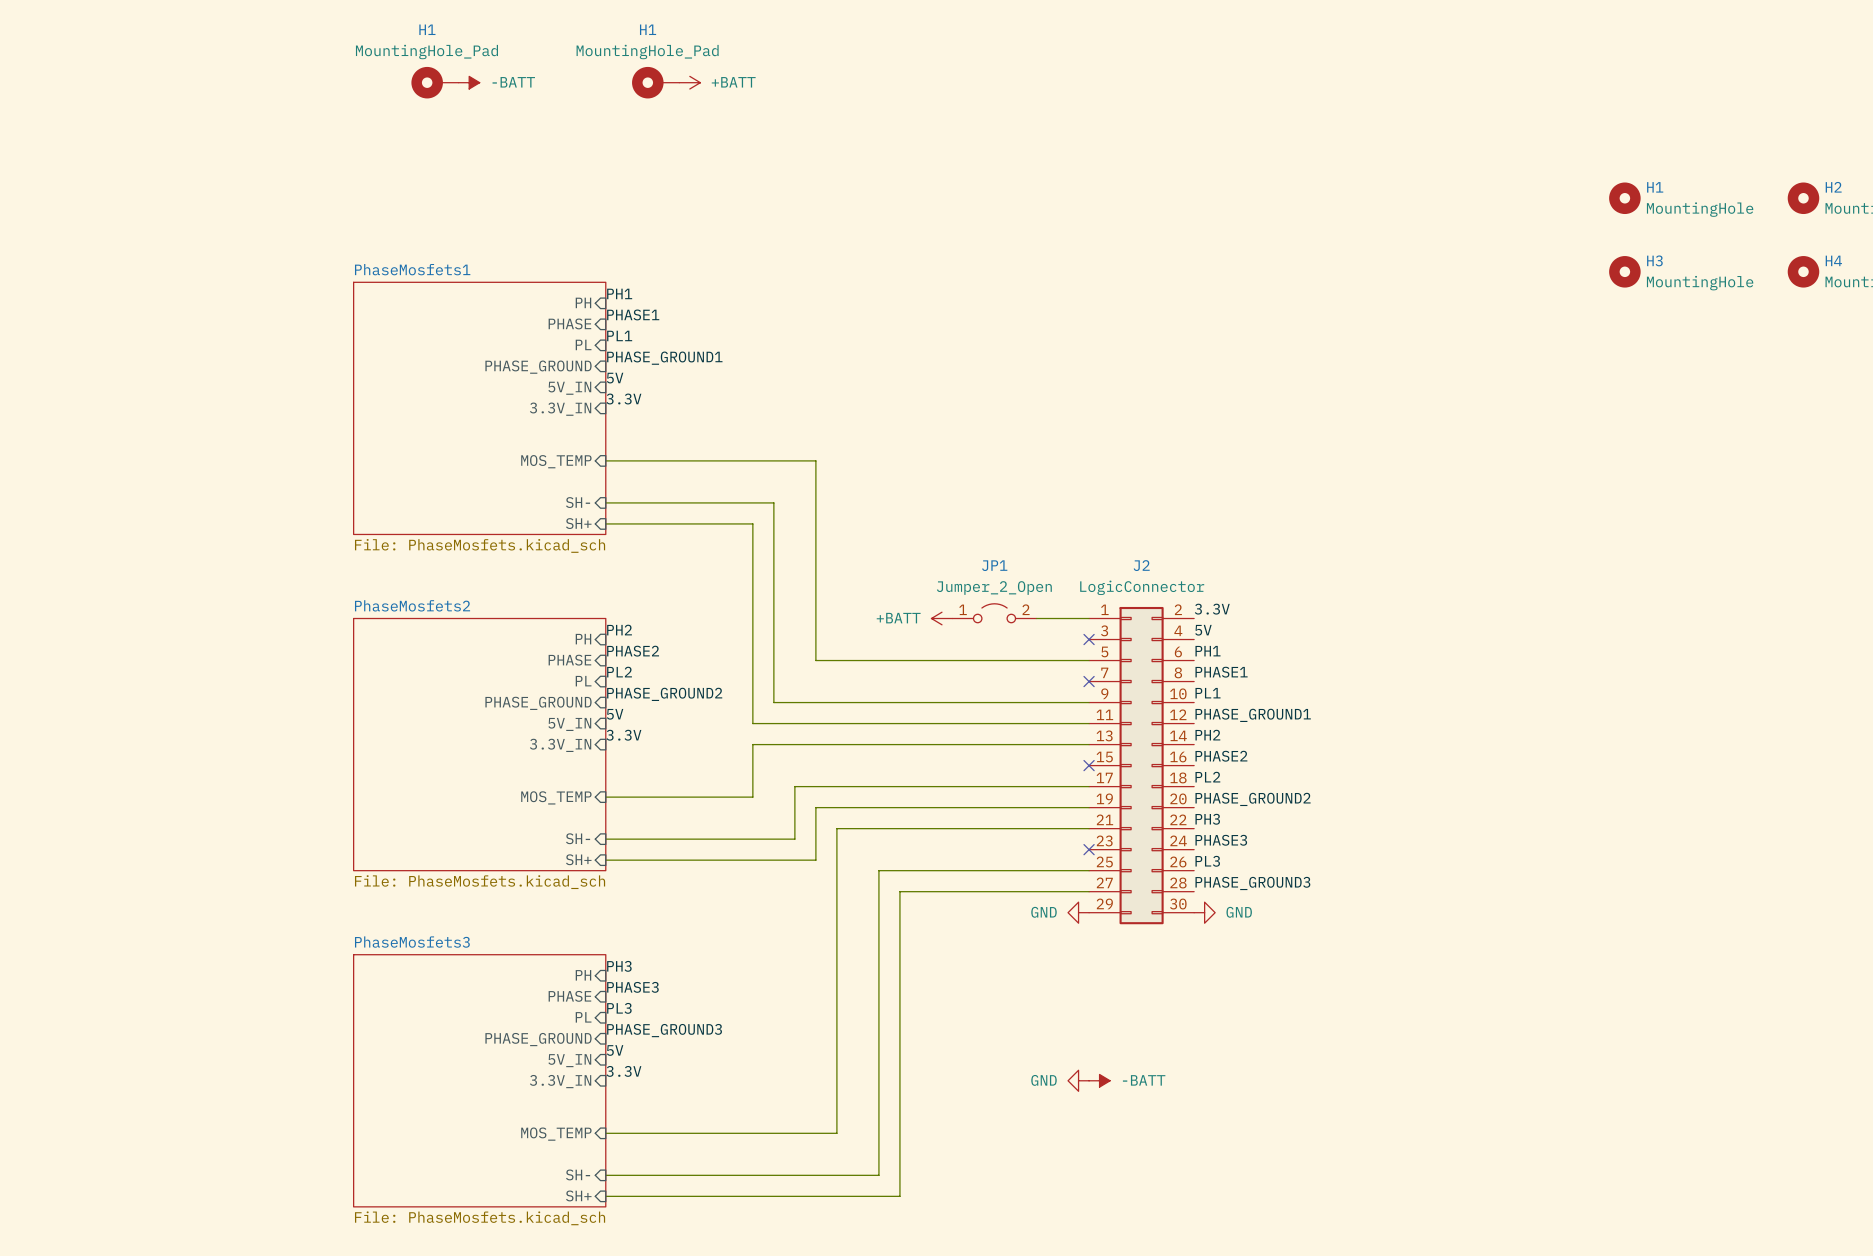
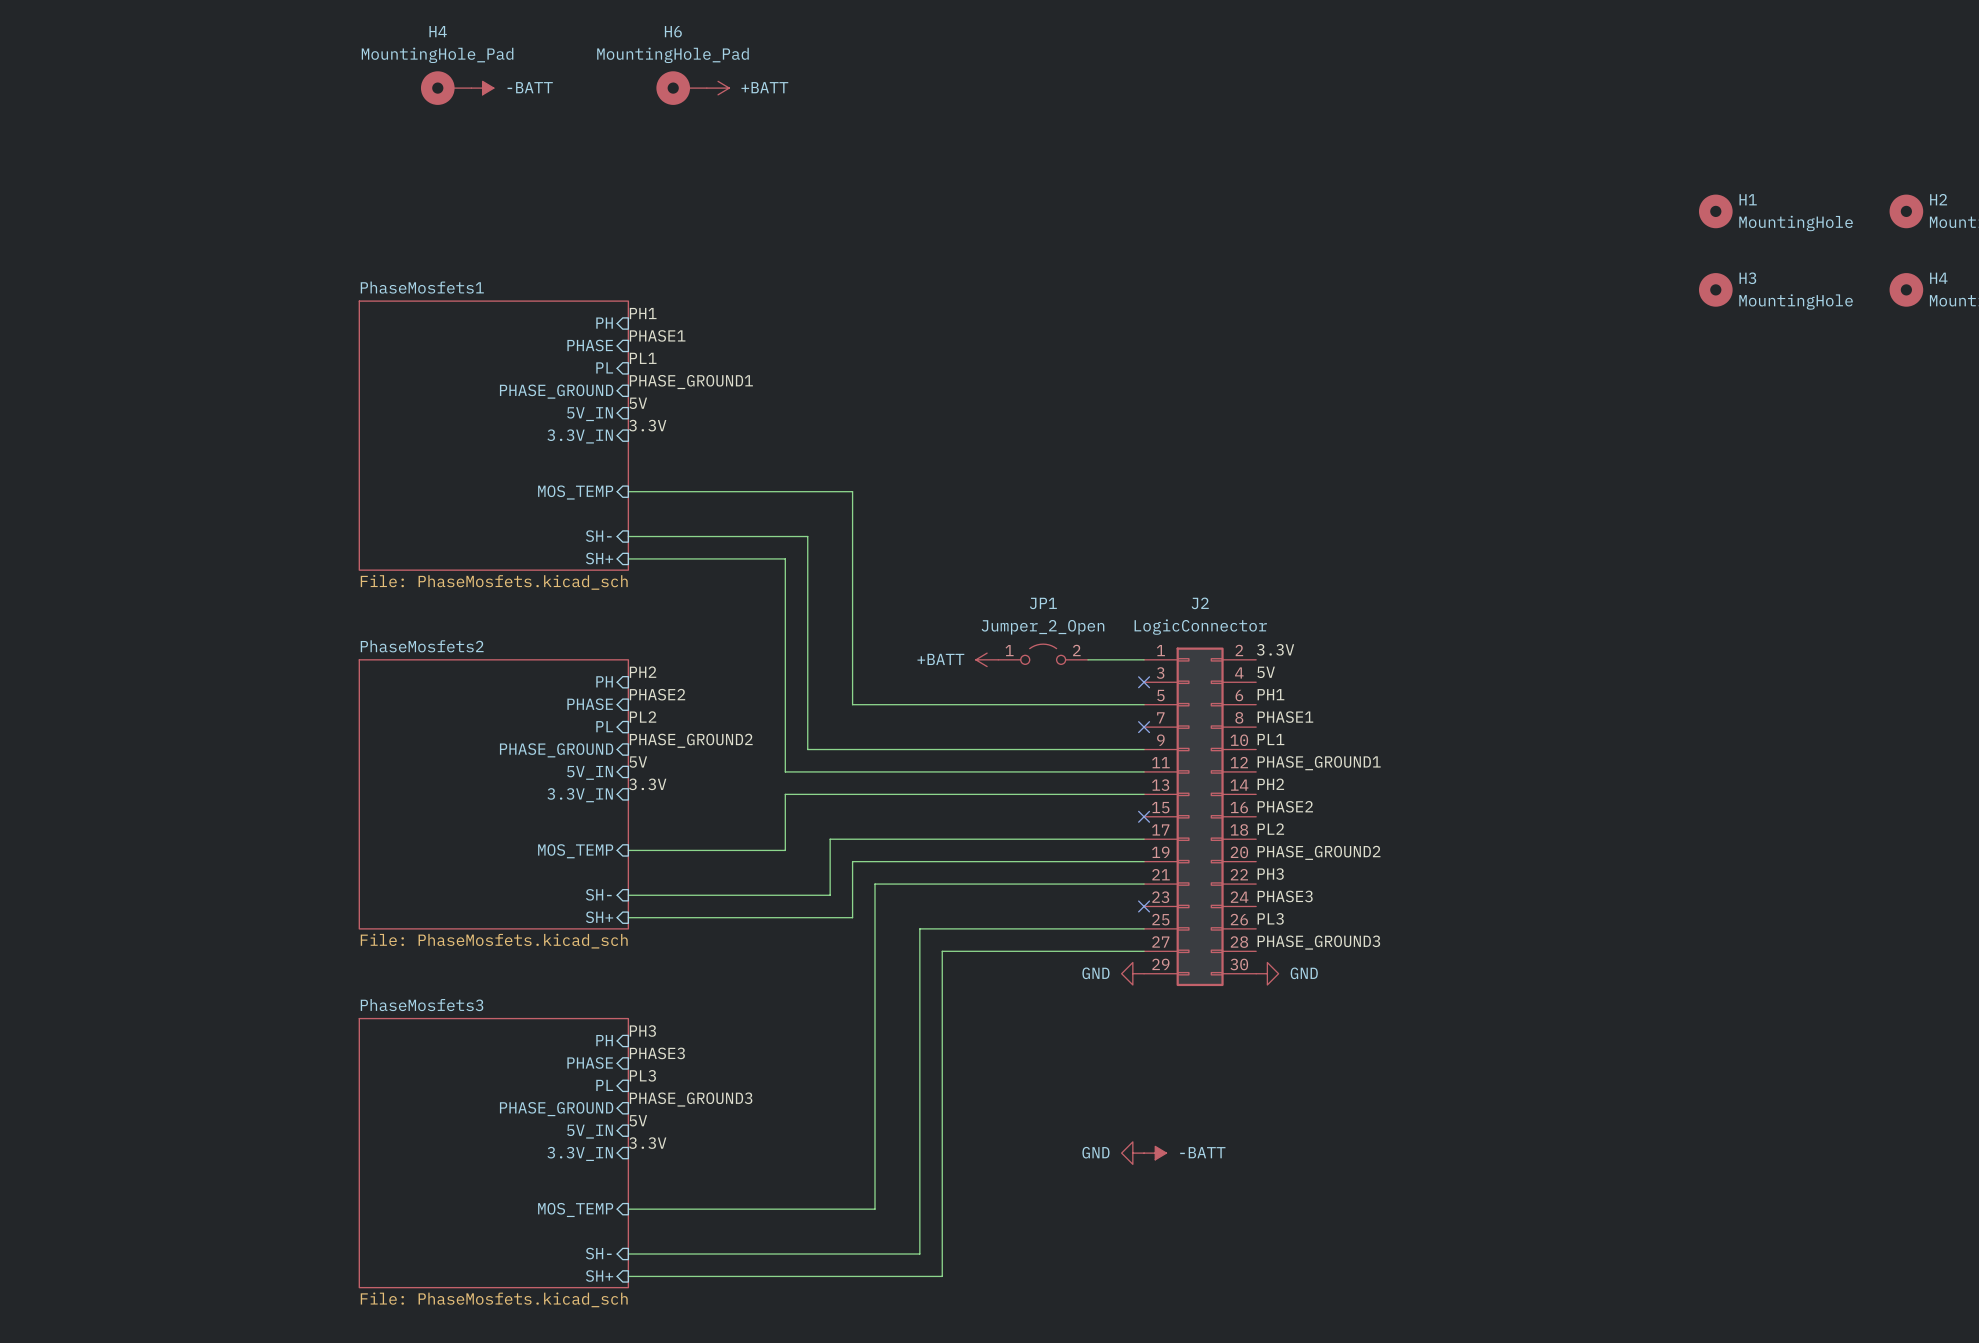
H1 name: H1 (427, 29) -> H4 (438, 31)
H1 name: H1 (648, 29) -> H6 (673, 31)

